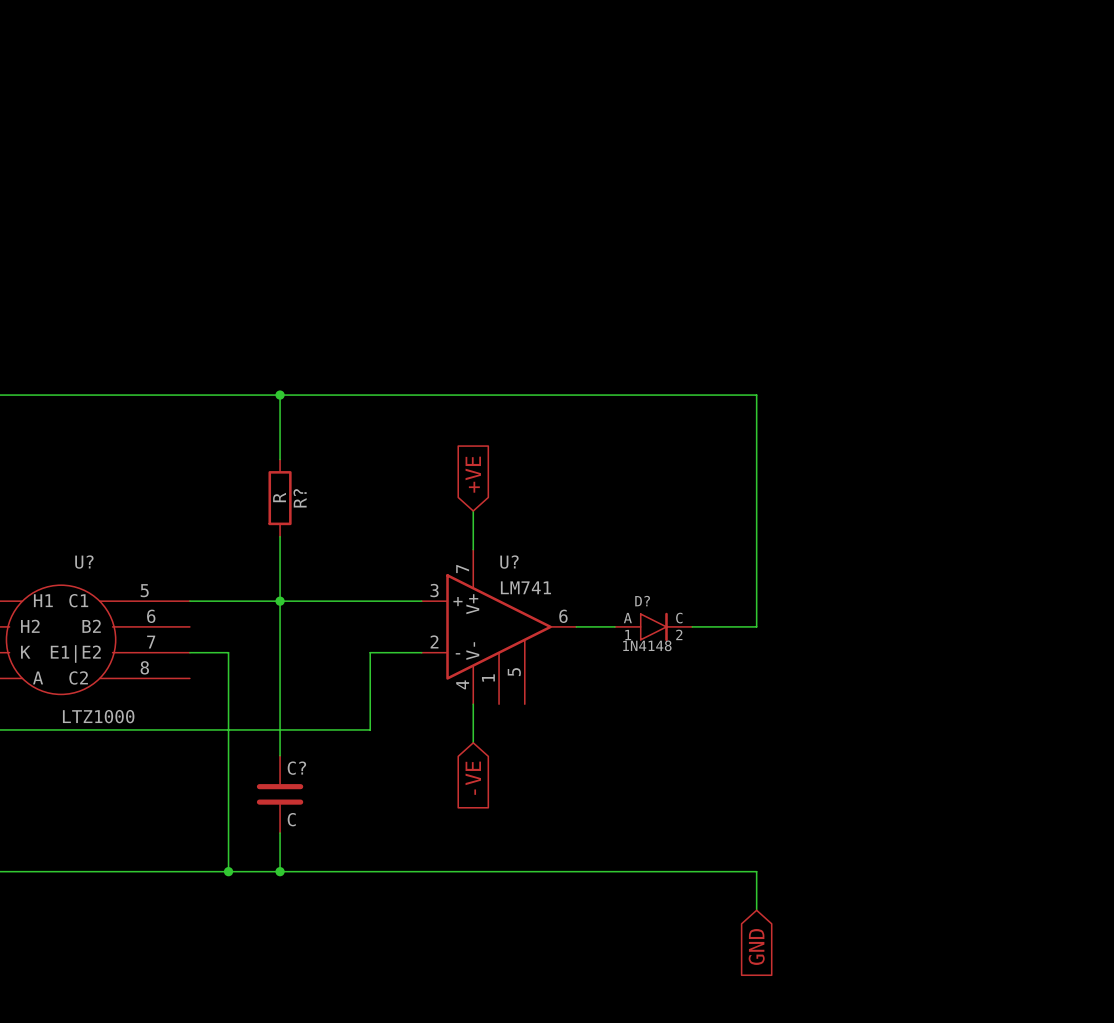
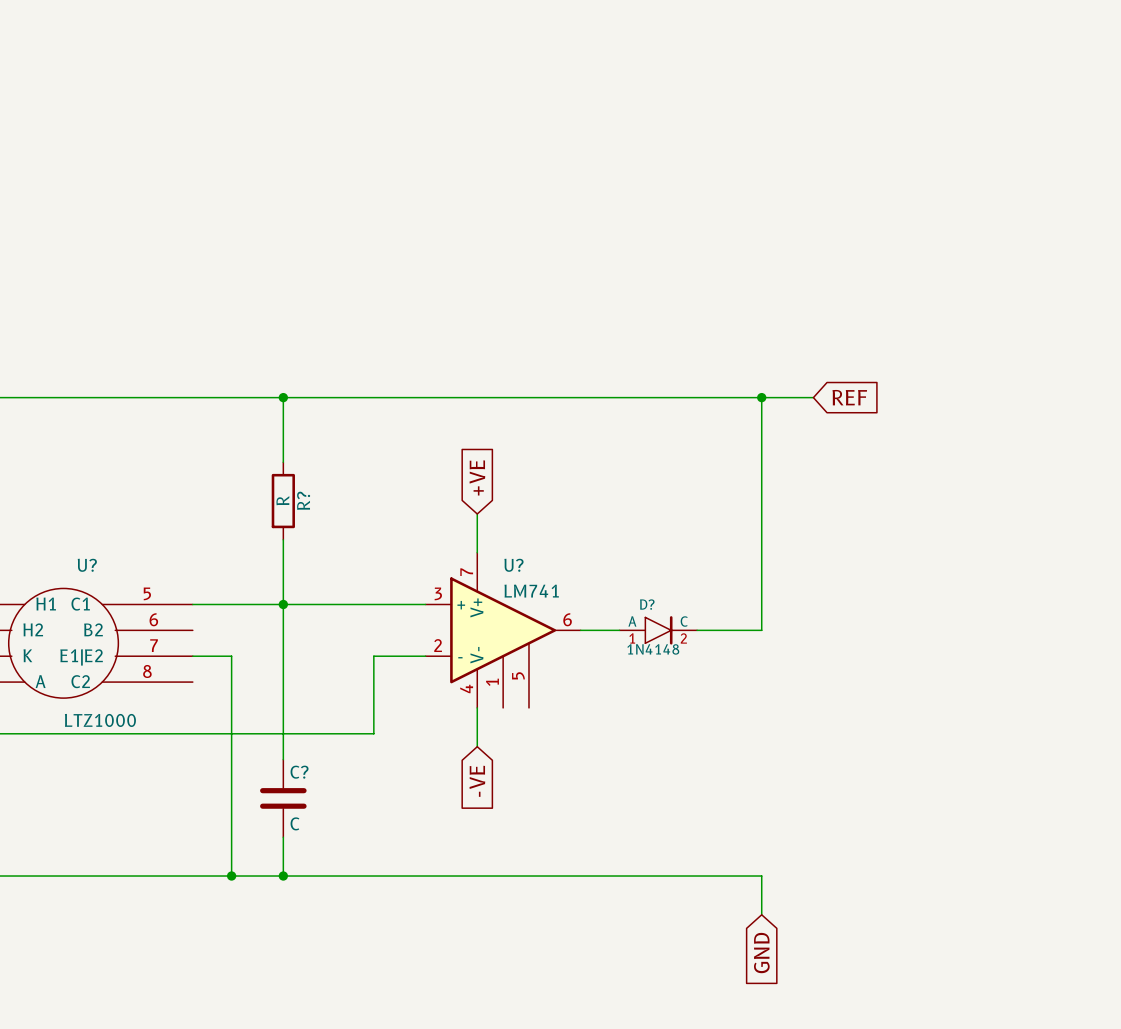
wire: none -> (761, 397) (813, 397)
junction: none -> (761, 397)
global label: none -> REF (849, 397)

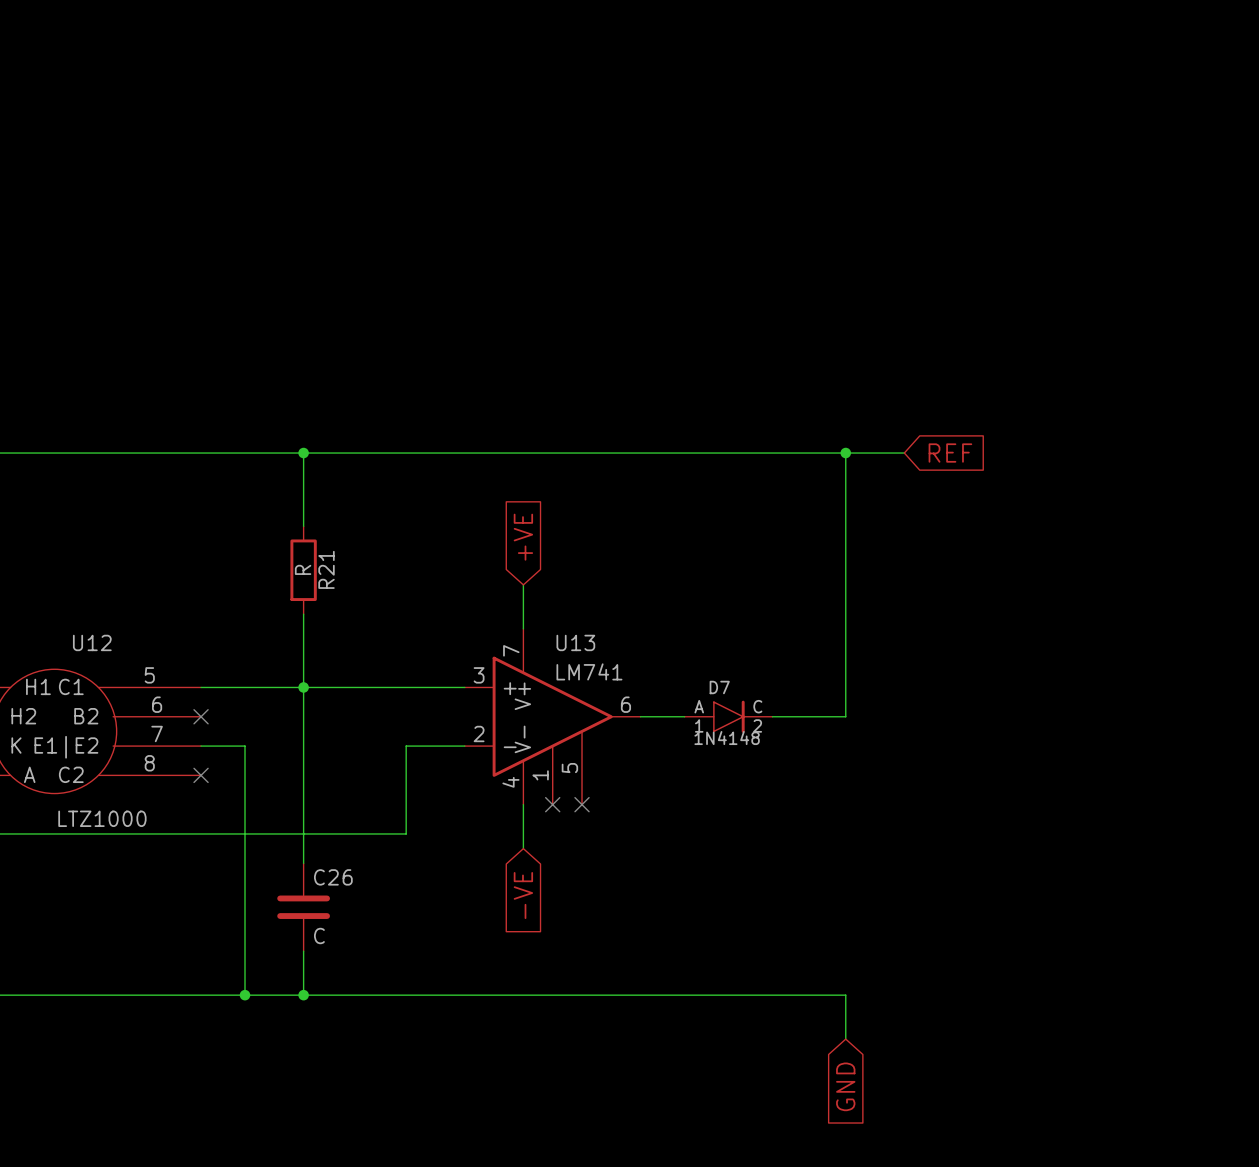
R? name: R? (303, 500) -> R21 (326, 569)
U? name: U? (87, 565) -> U12 (92, 642)
U? name: U? (513, 565) -> U13 (575, 642)
D? name: D? (647, 604) -> D7 (719, 687)
no-connect mark: none -> (201, 716)
no-connect mark: none -> (201, 775)
no-connect mark: none -> (552, 804)
no-connect mark: none -> (582, 804)
C? name: C? (299, 772) -> C26 (333, 877)

